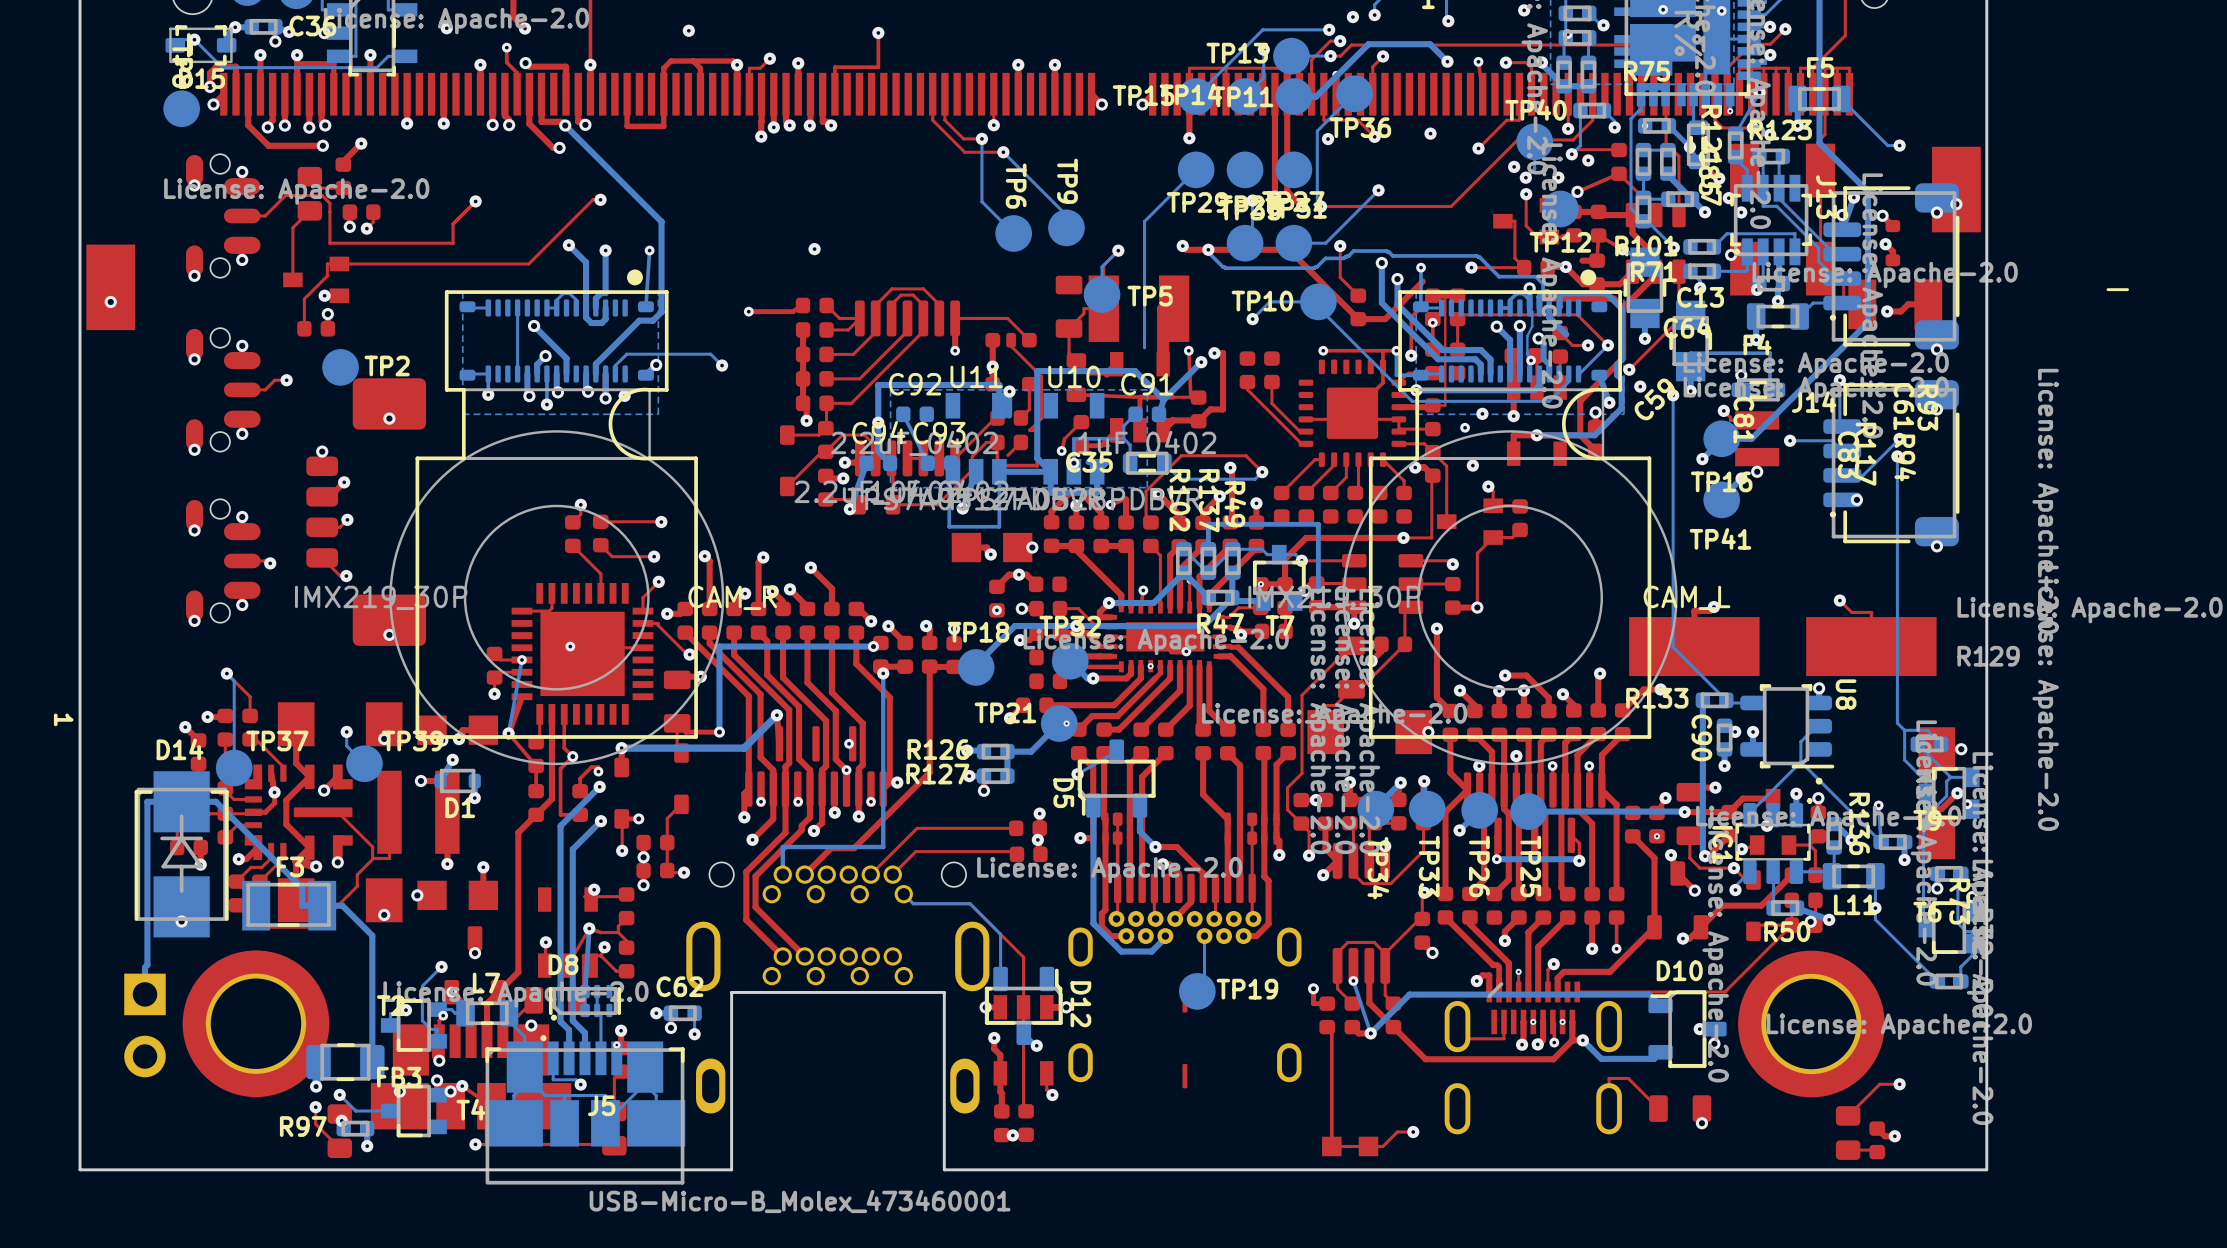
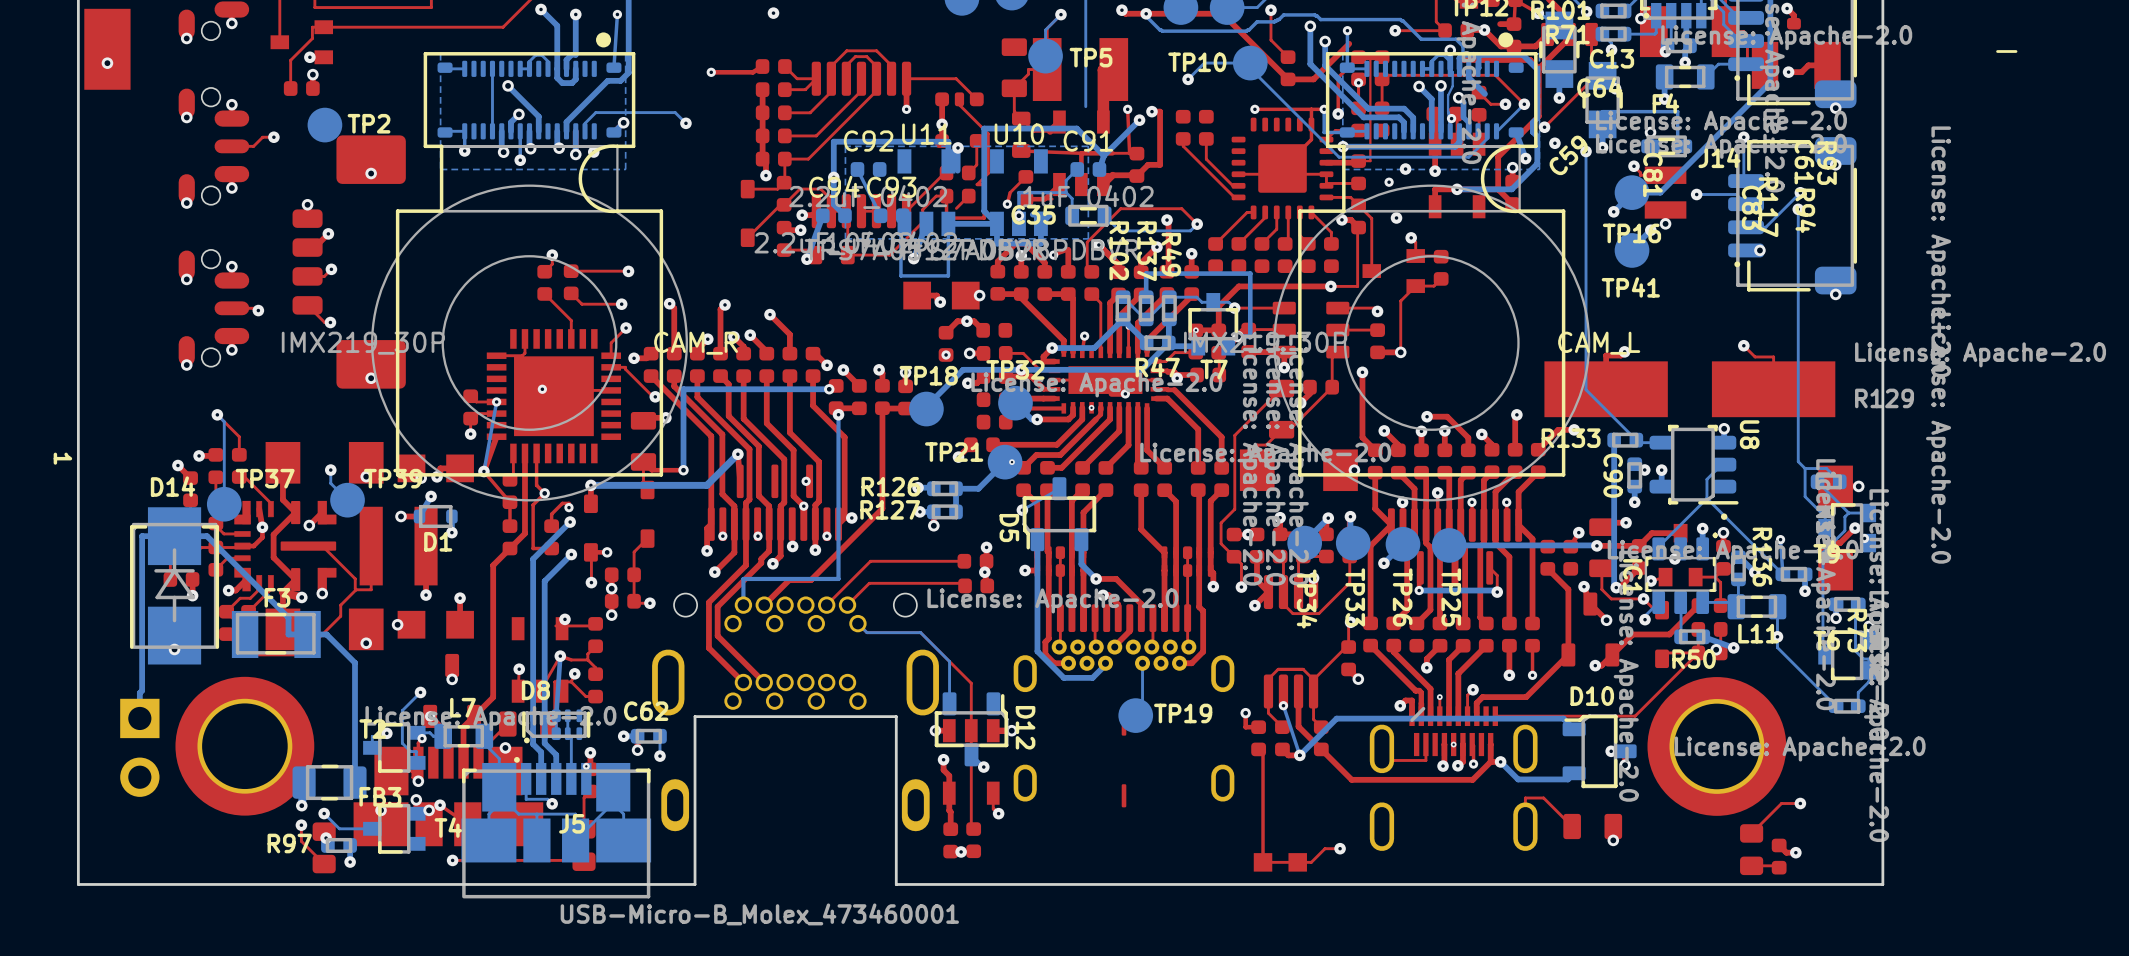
via: (1656, 836) -> none
via: (1562, 1021) -> none

